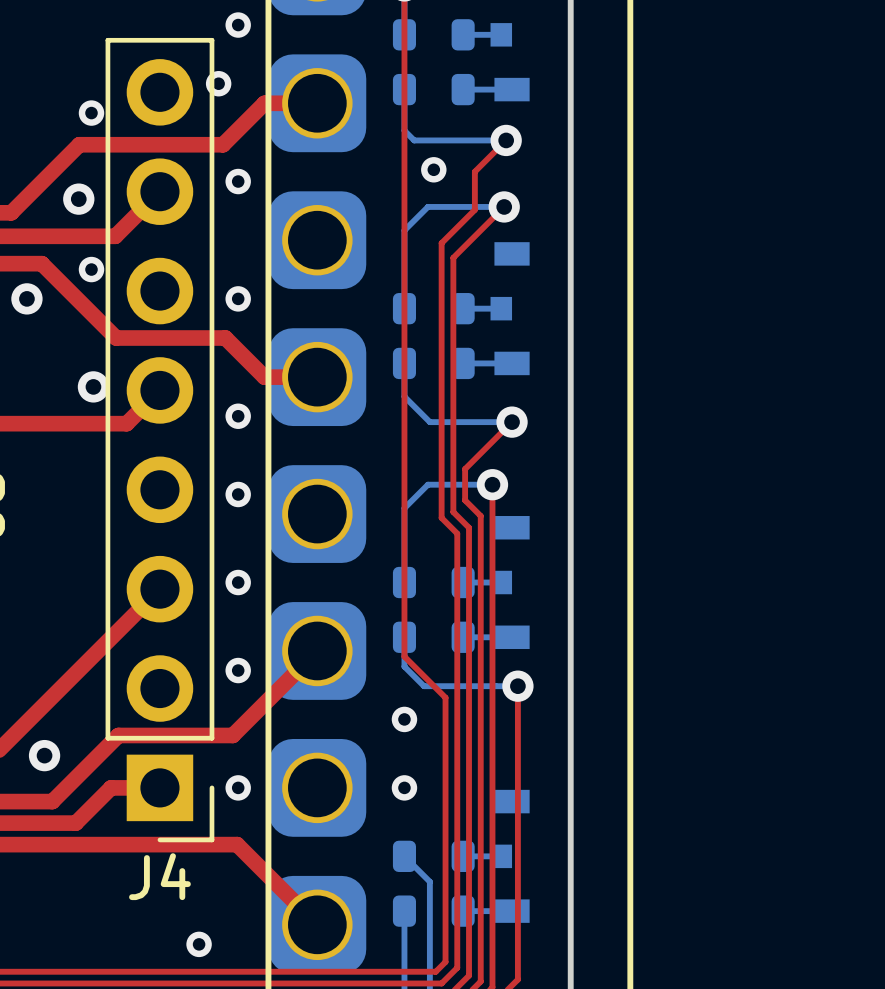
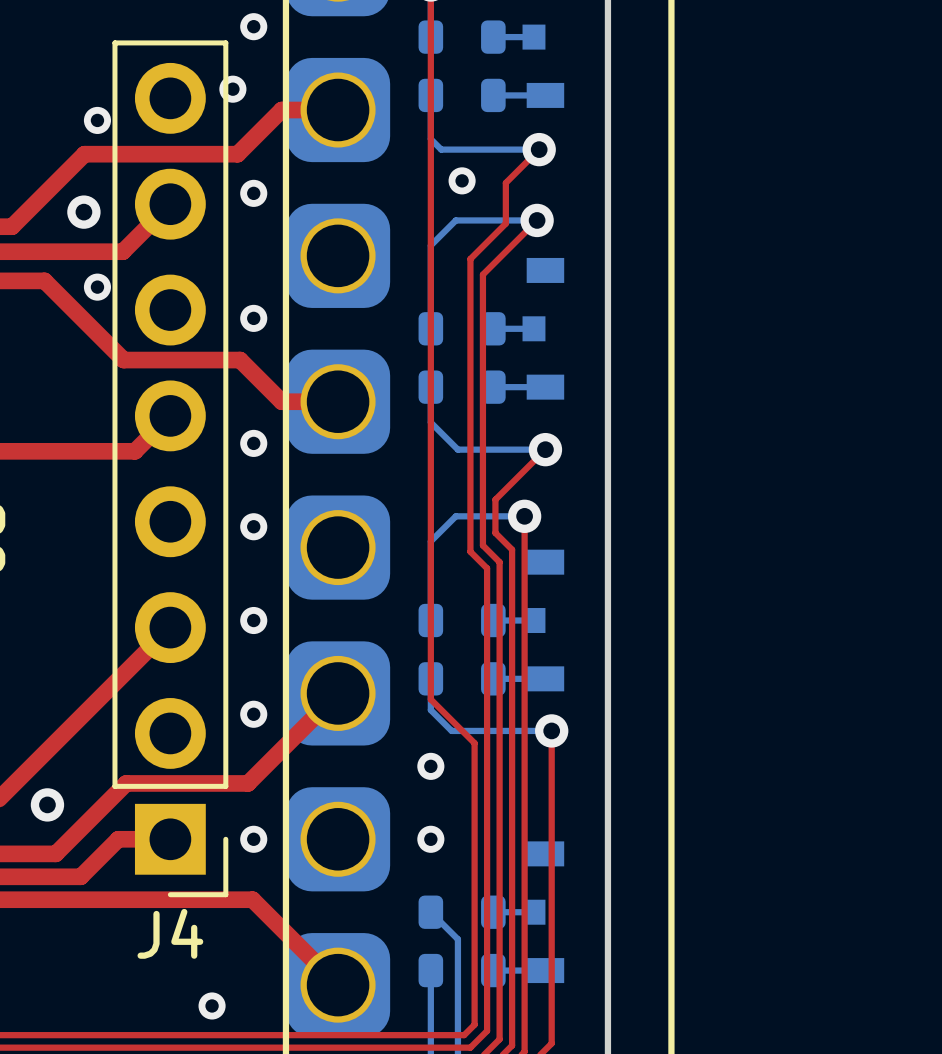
via: (26, 298) -> none
via: (93, 386) -> none

